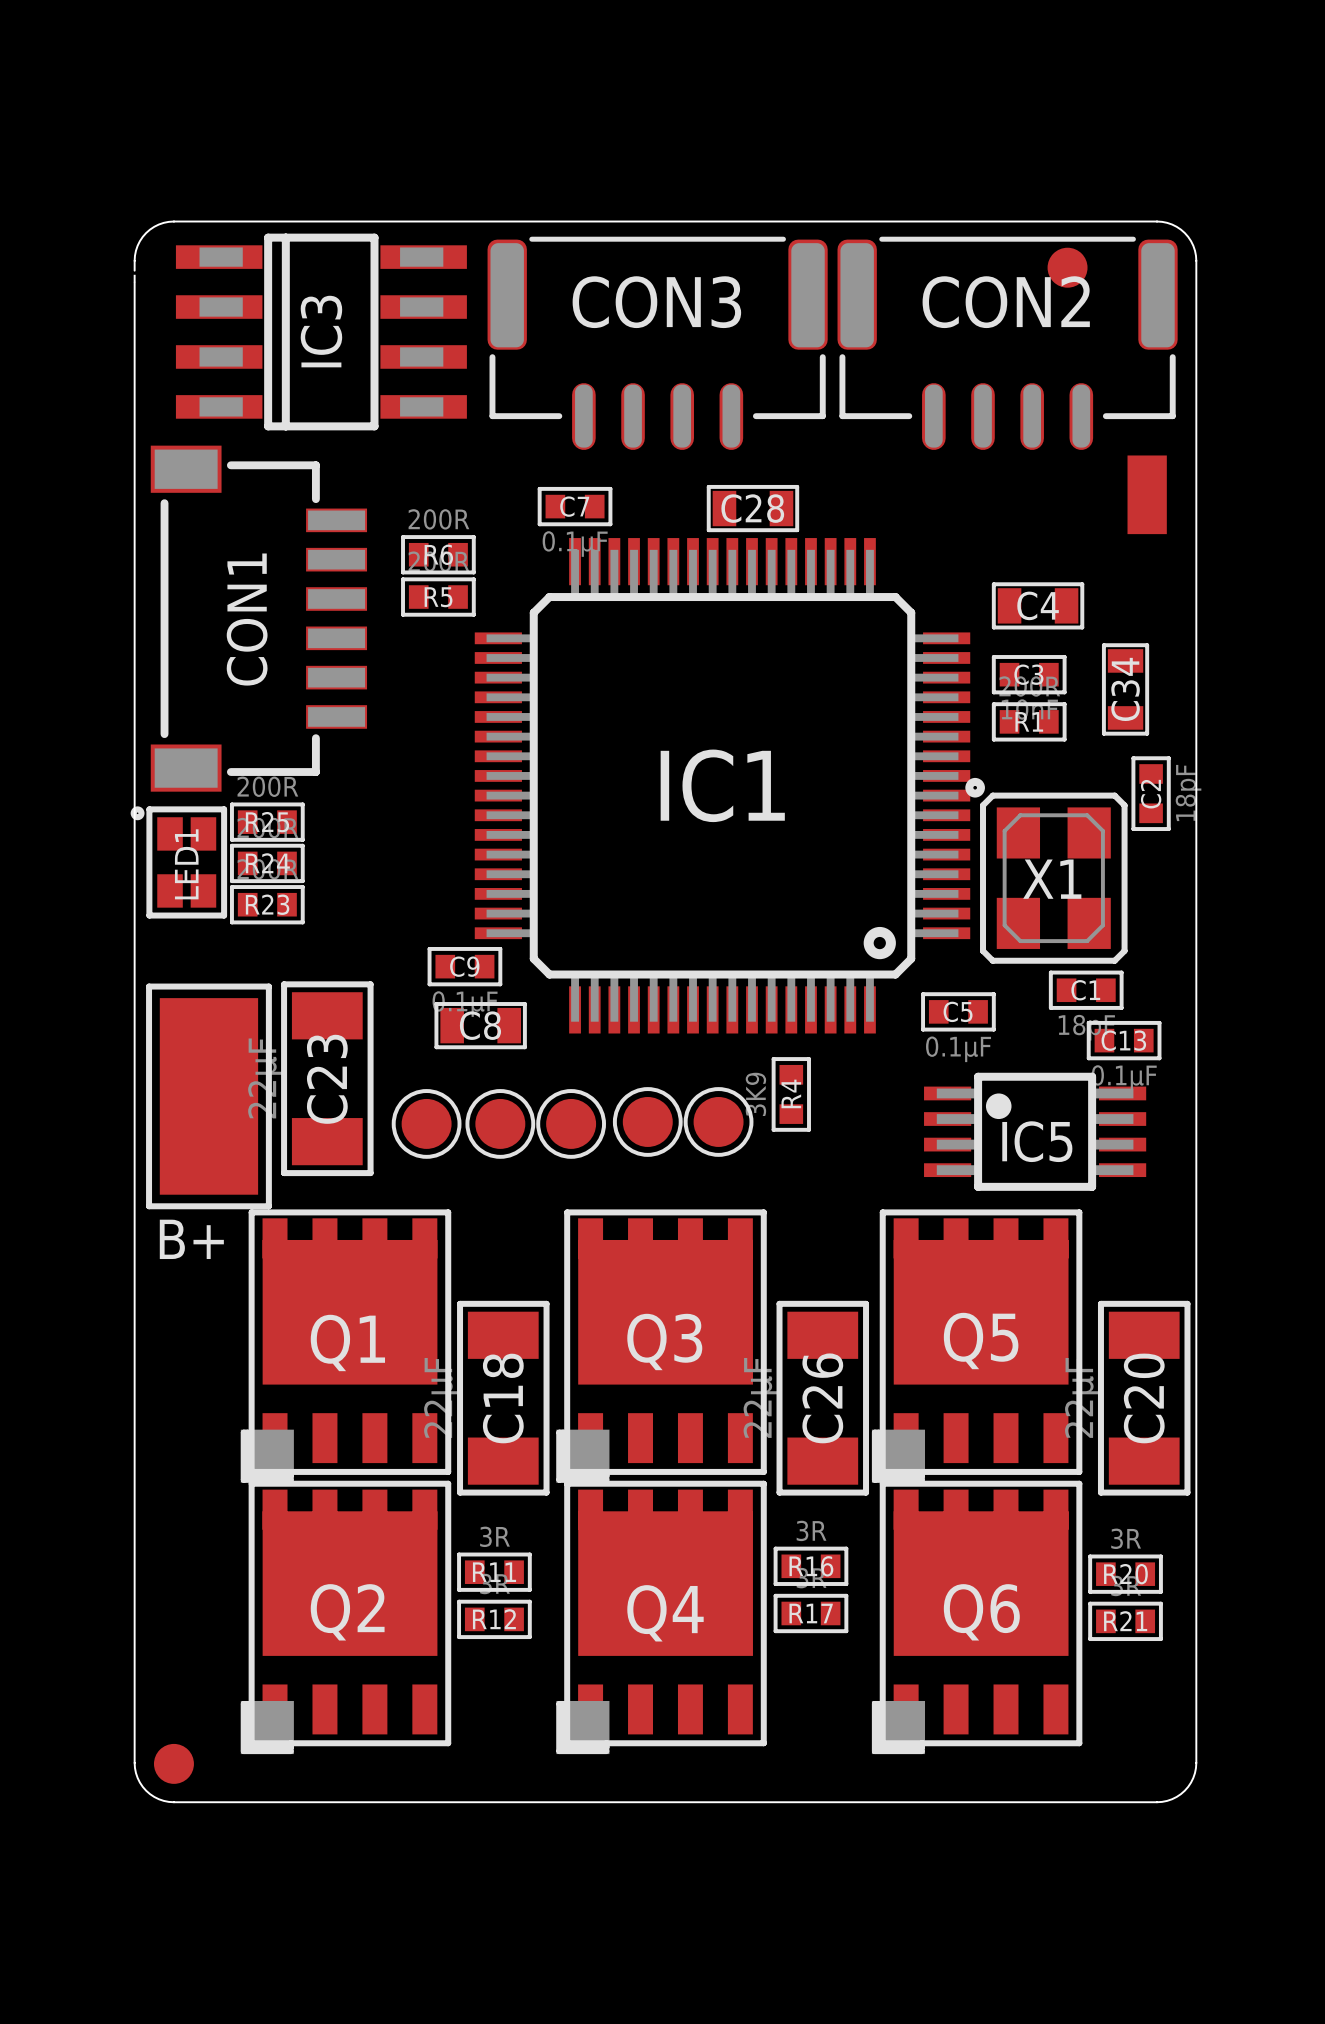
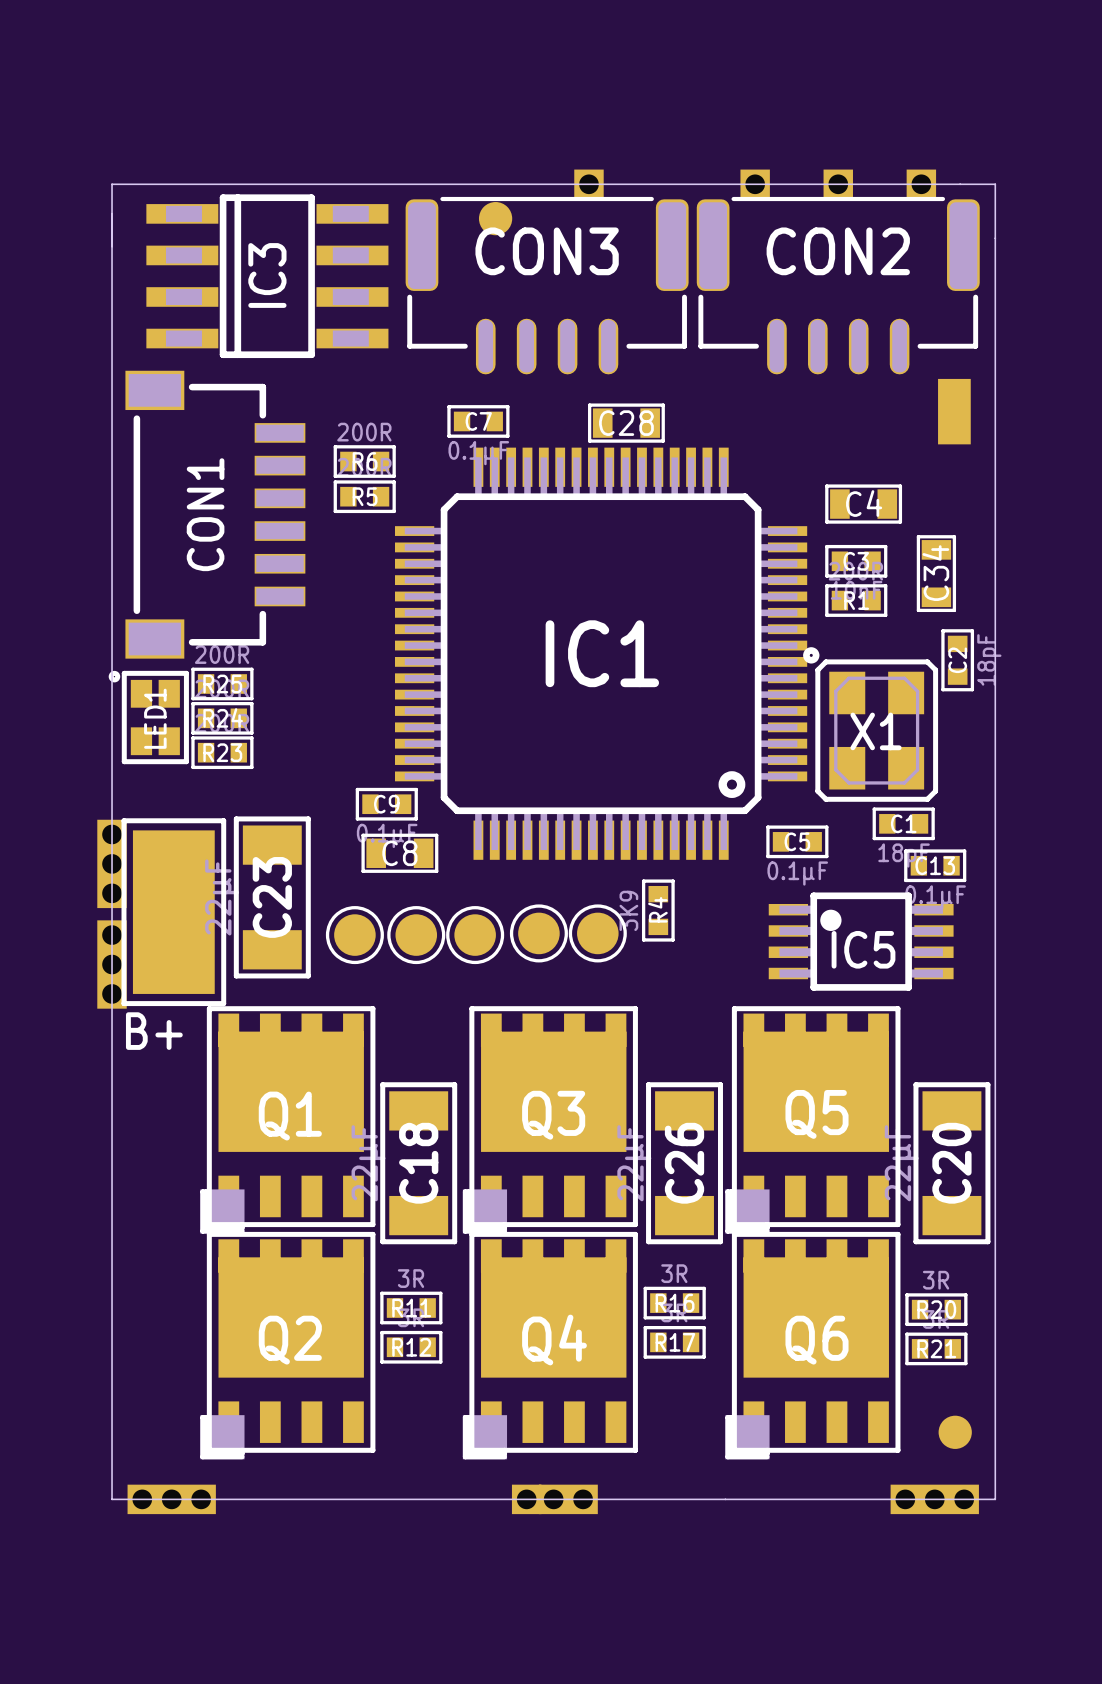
board edge: none -> (112, 184) (112, 1499) (995, 1499) (995, 184) (112, 184)
drawing: [134, 221, 1197, 1803] -> none
part: none -> (588, 184)
part: none -> (755, 184)
part: none -> (838, 184)
part: none -> (921, 184)
part position: (1067, 267) -> (495, 218)
part: none -> (112, 834)
part: none -> (112, 863)
part: none -> (112, 893)
part: none -> (112, 935)
part: none -> (112, 964)
part: none -> (112, 993)
part: none -> (955, 1432)
part: (173, 1763) -> none
part: none -> (142, 1499)
part: none -> (171, 1499)
part: none -> (201, 1499)
part: none -> (526, 1499)
part: none -> (553, 1499)
part: none -> (583, 1499)
part: none -> (905, 1499)
part: none -> (934, 1499)
part: none -> (964, 1499)

